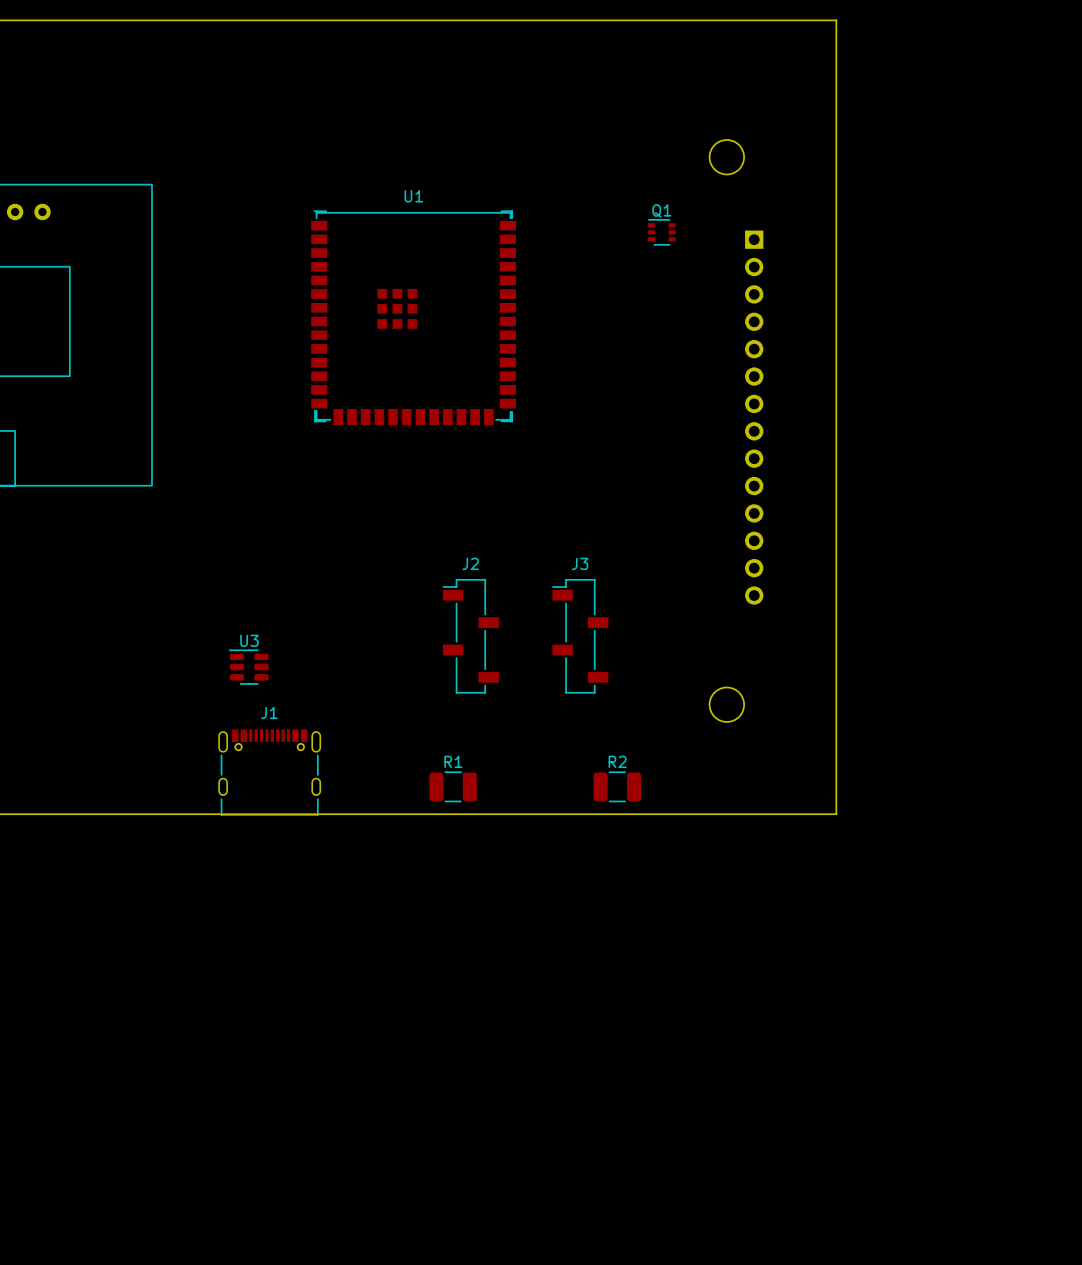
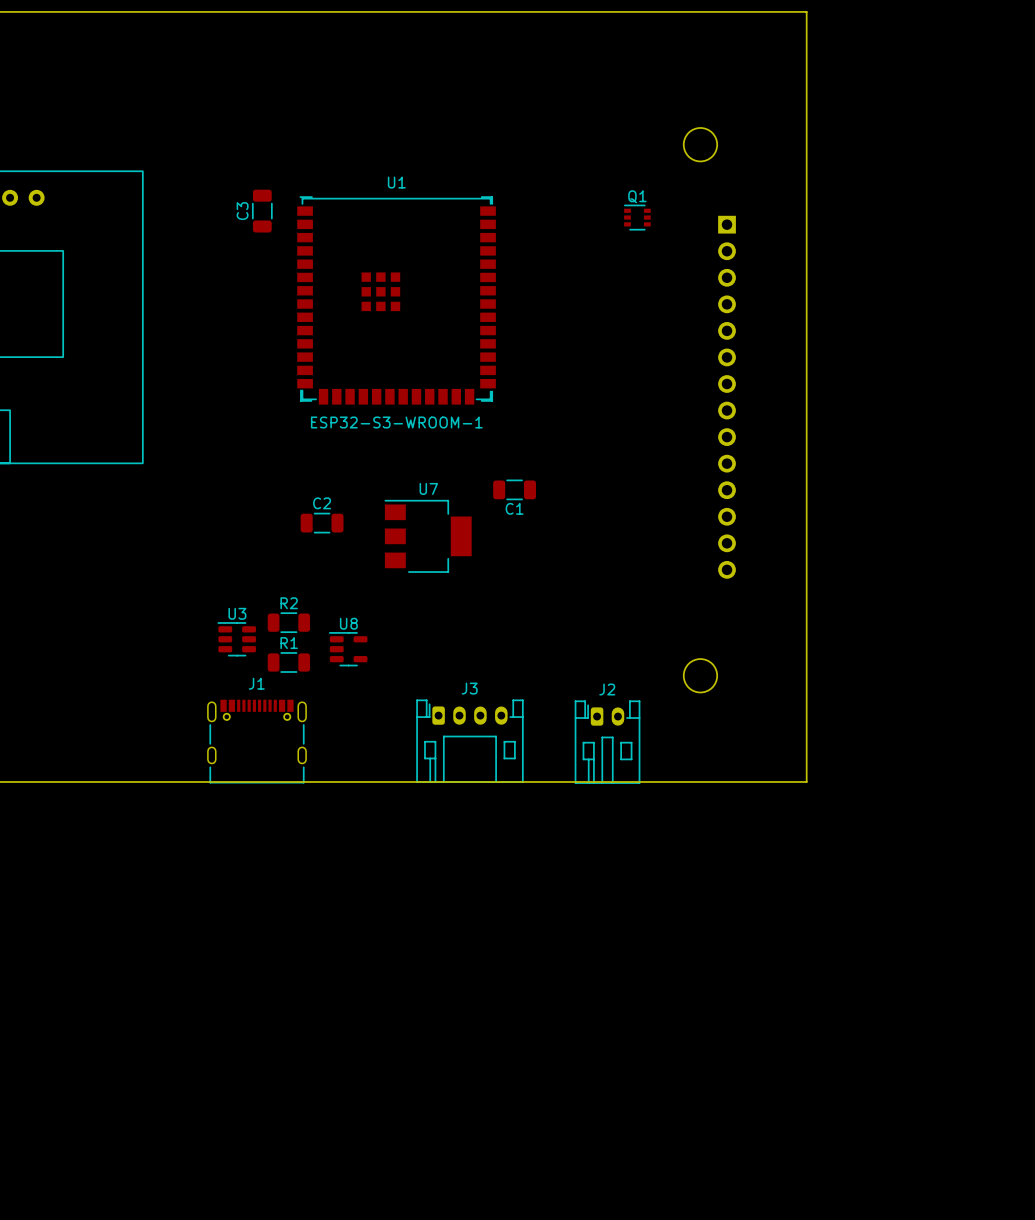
C3: none -> (262, 211)
U1 value: none -> ESP32-S3-WROOM-1 (396, 422)
C1: none -> (514, 489)
C2: none -> (322, 523)
U7: none -> (428, 536)
J2 footprint: [442, 579, 499, 694] -> [574, 700, 641, 784]
J3 footprint: [552, 579, 609, 694] -> [416, 699, 524, 783]
U8: none -> (348, 649)
R1 footprint: [429, 771, 477, 803] -> [267, 652, 311, 673]
R2 footprint: [593, 771, 642, 803] -> [267, 612, 311, 633]

